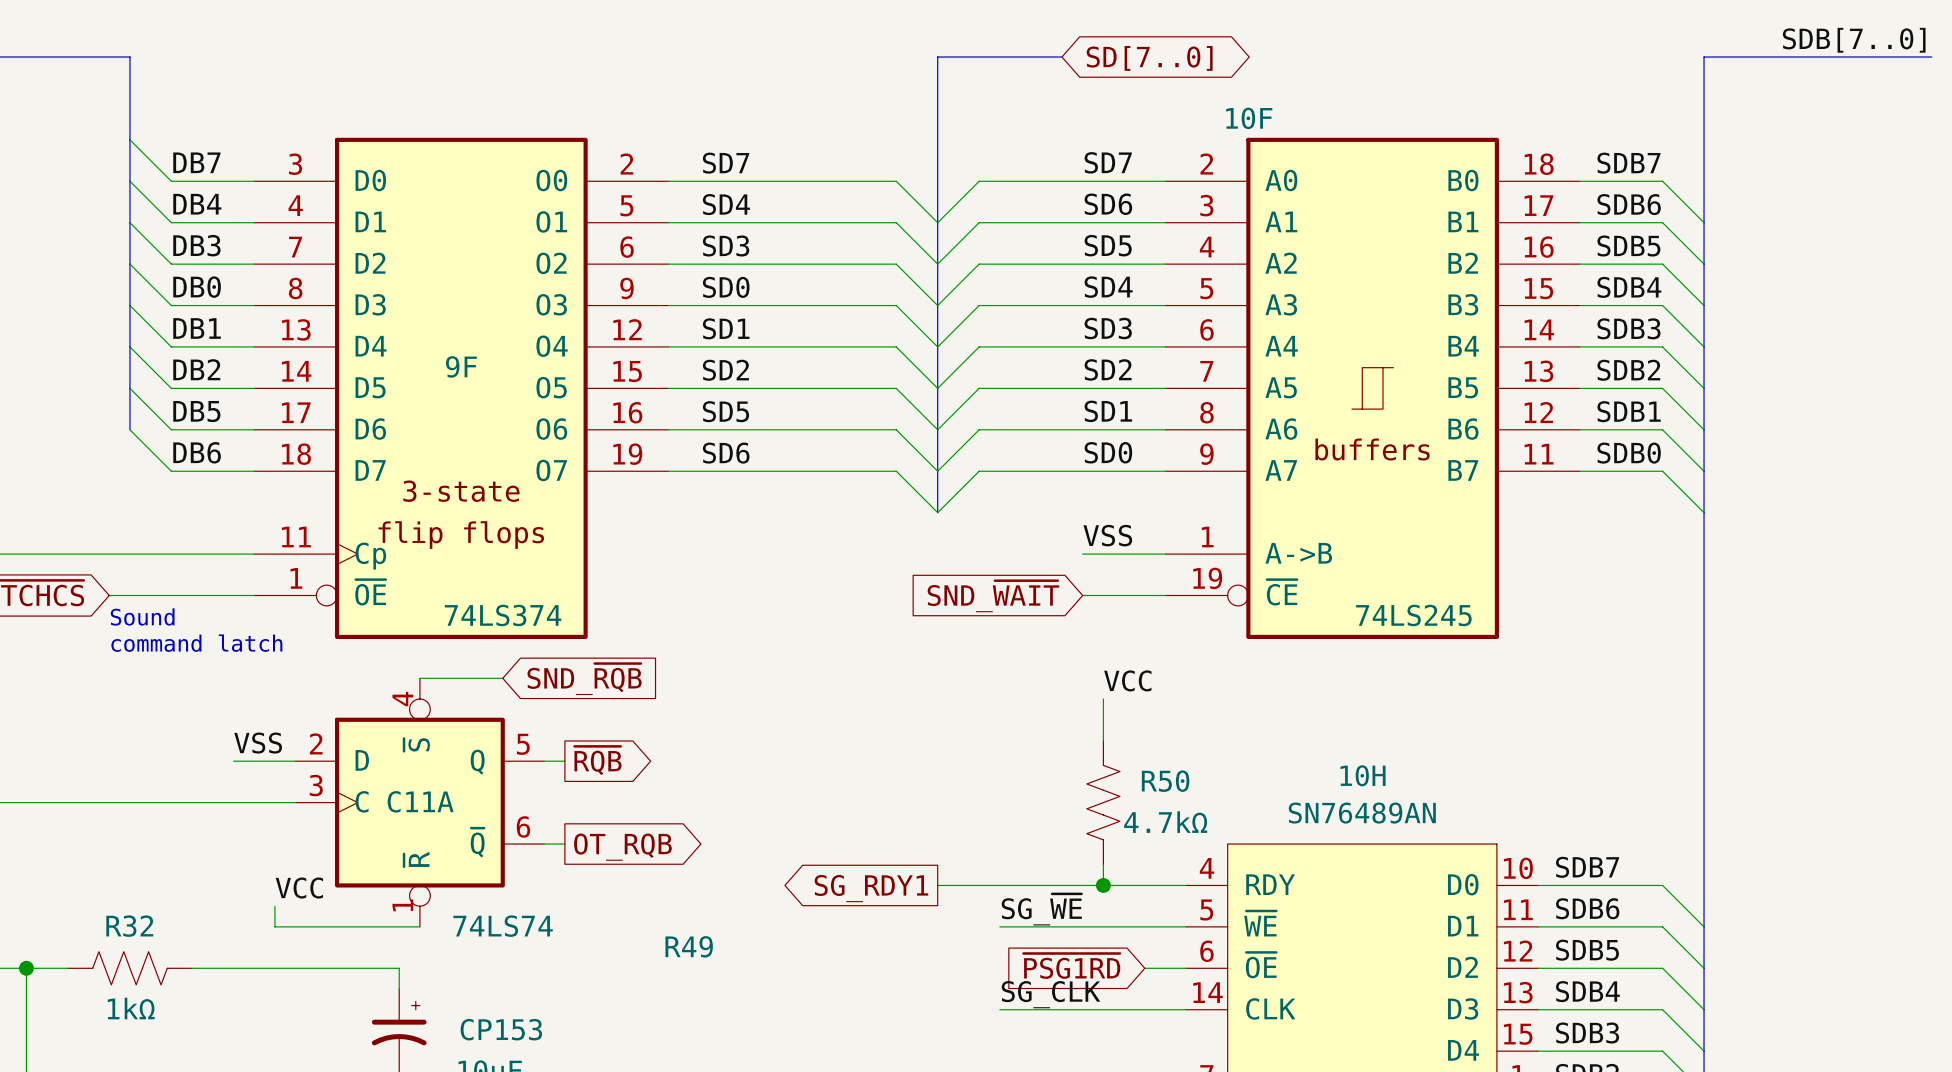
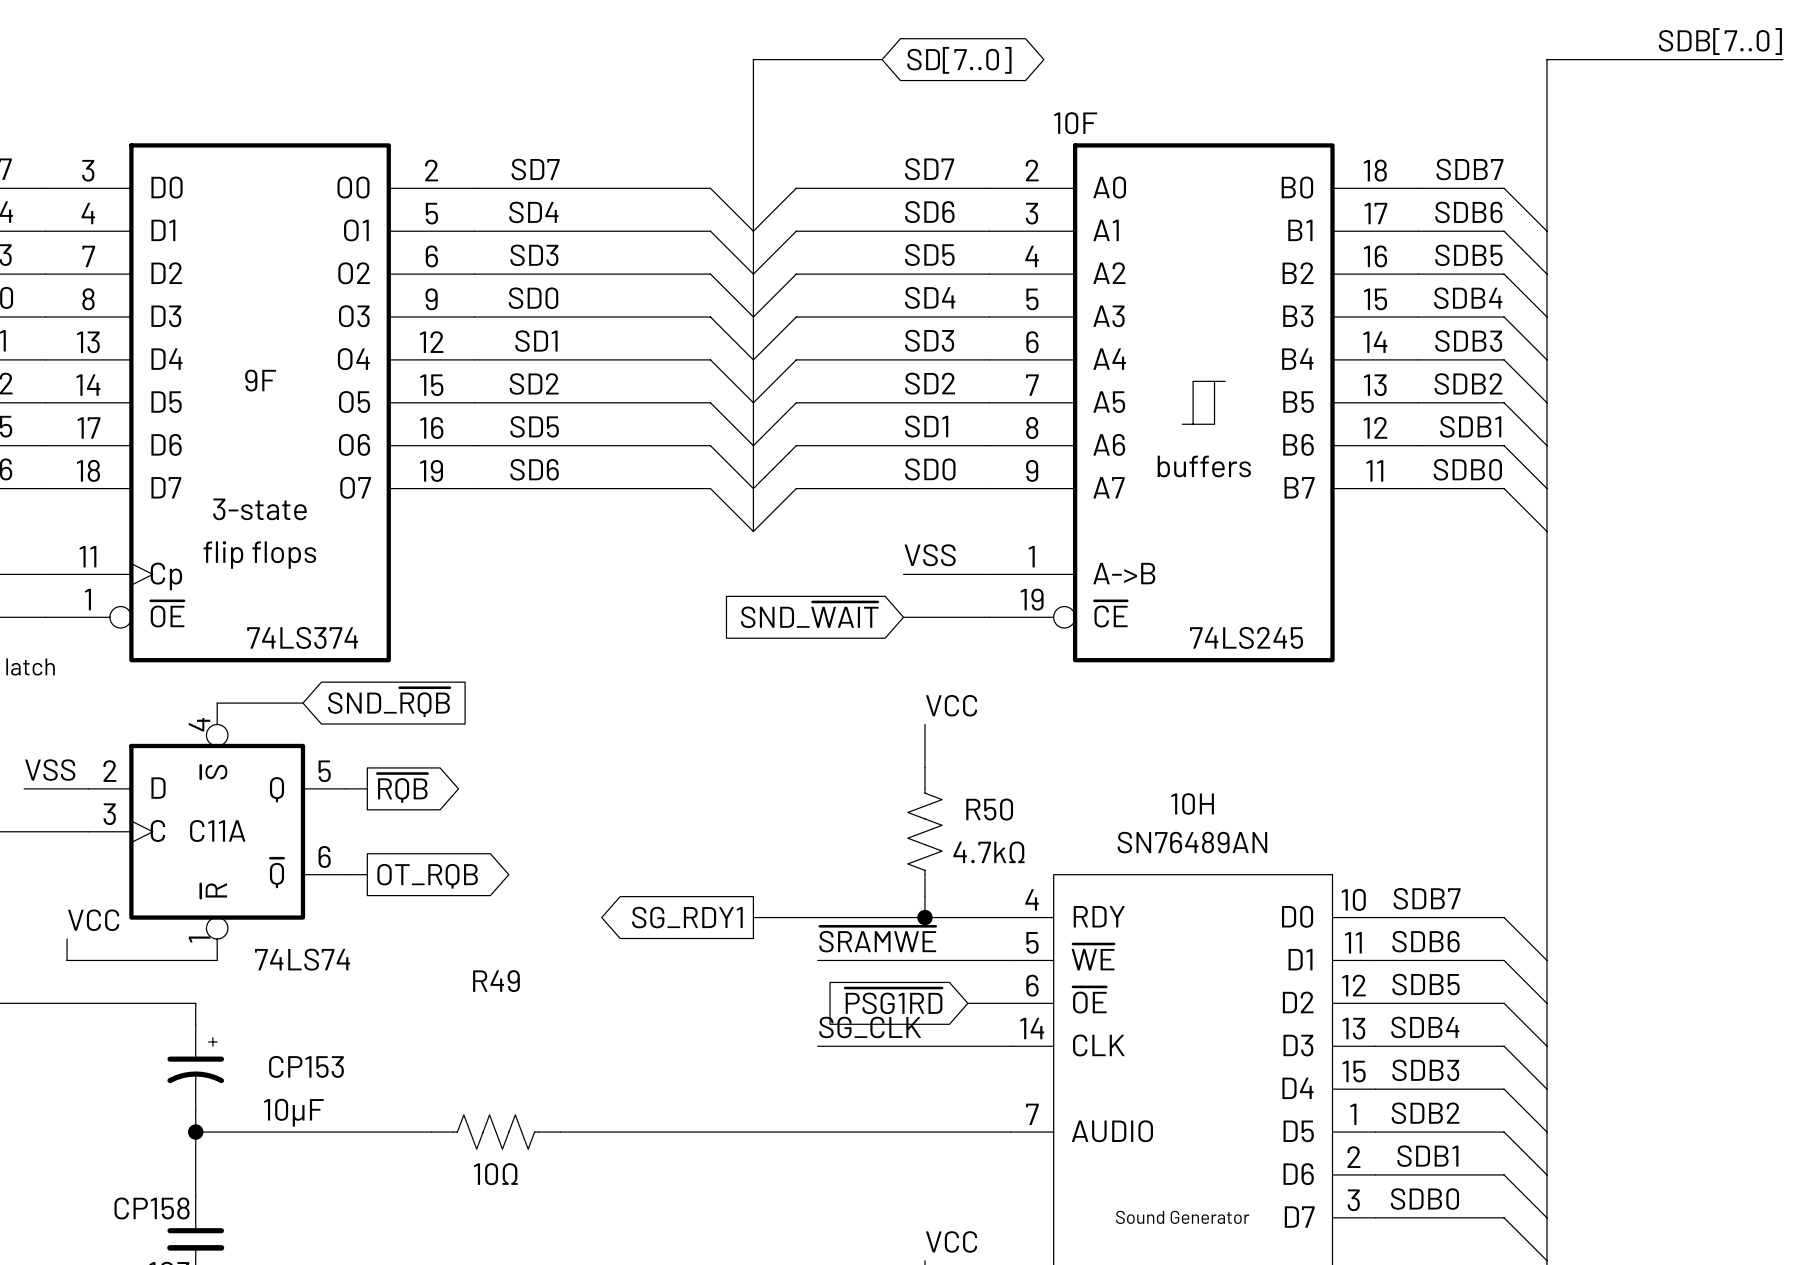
label: SG_~{WE} (1041, 909) -> ~{SRAMWE} (877, 939)

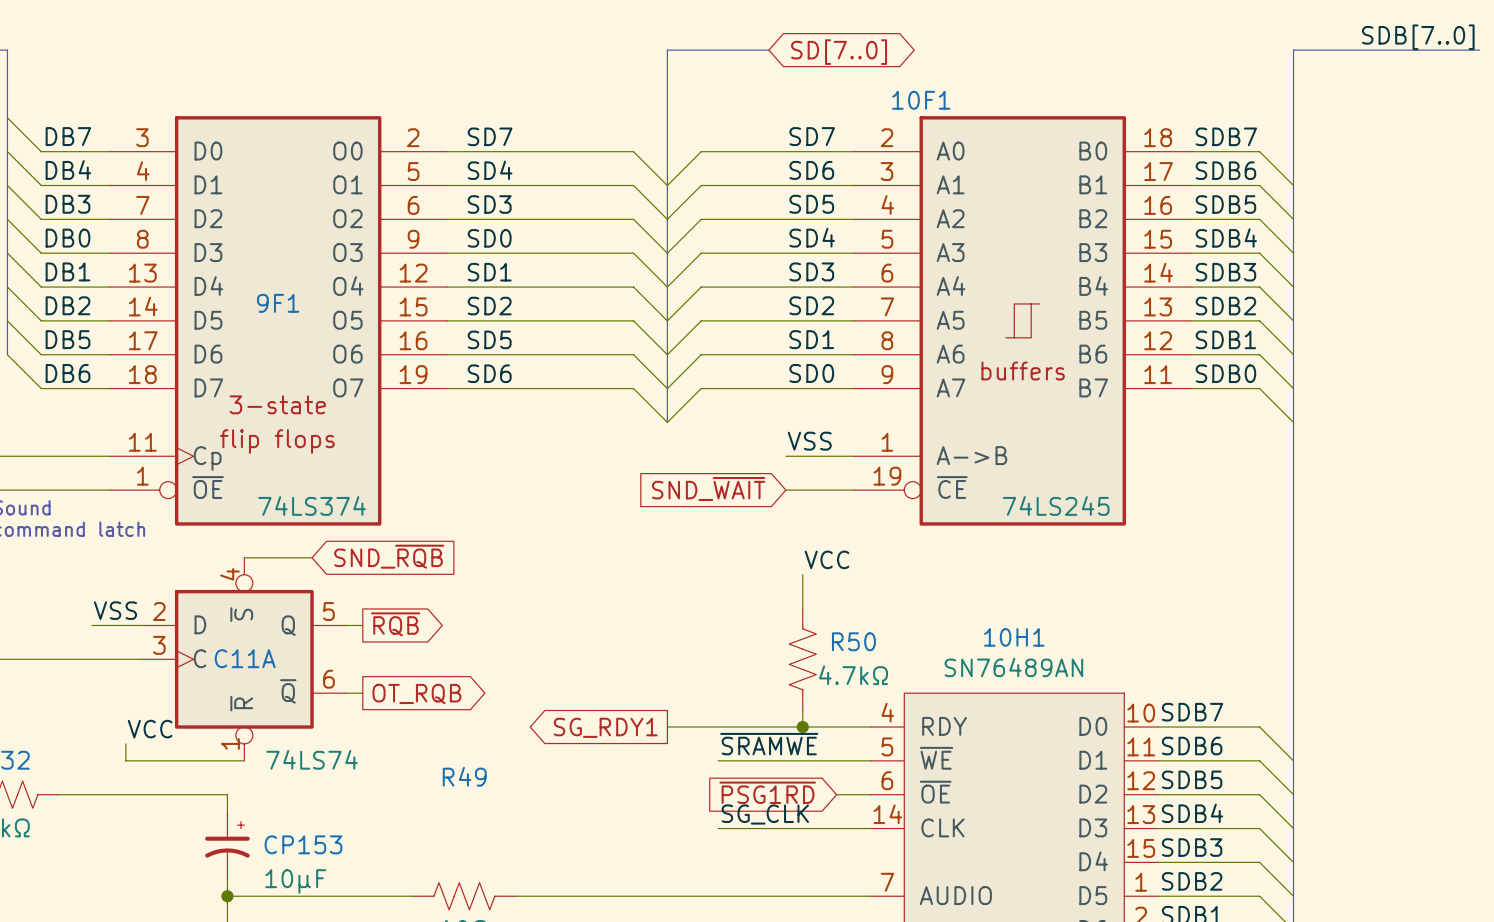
10F name: 10F (1075, 123) -> 10F1 (921, 100)
9F name: 9F (260, 380) -> 9F1 (278, 303)
10H name: 10H (1192, 803) -> 10H1 (1014, 637)

